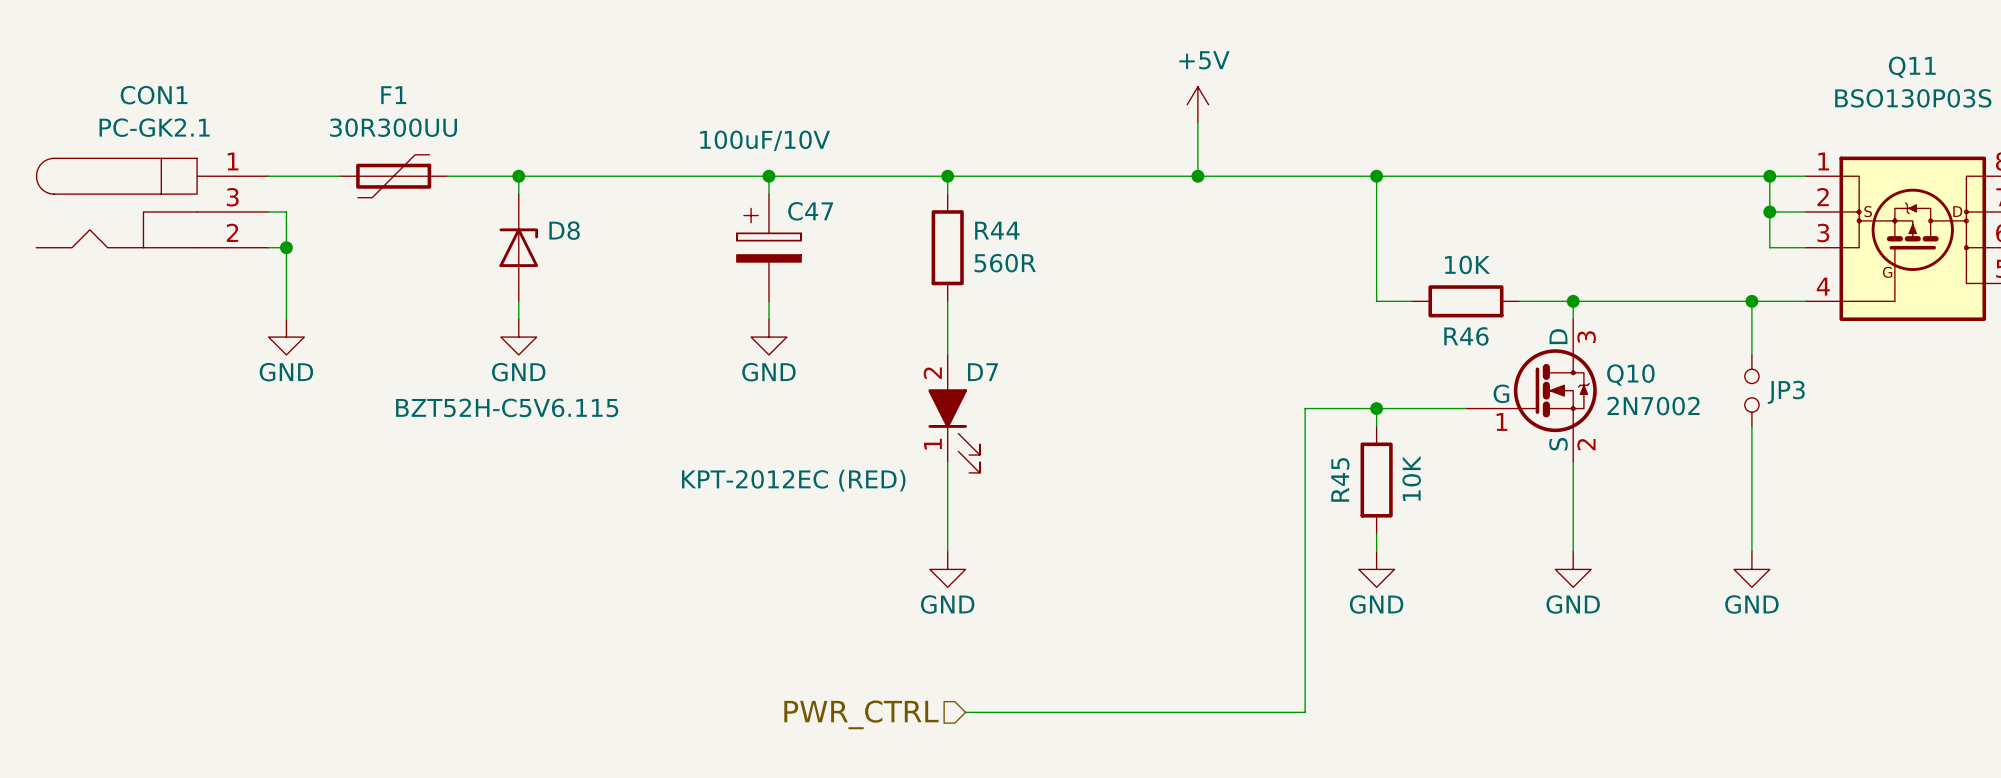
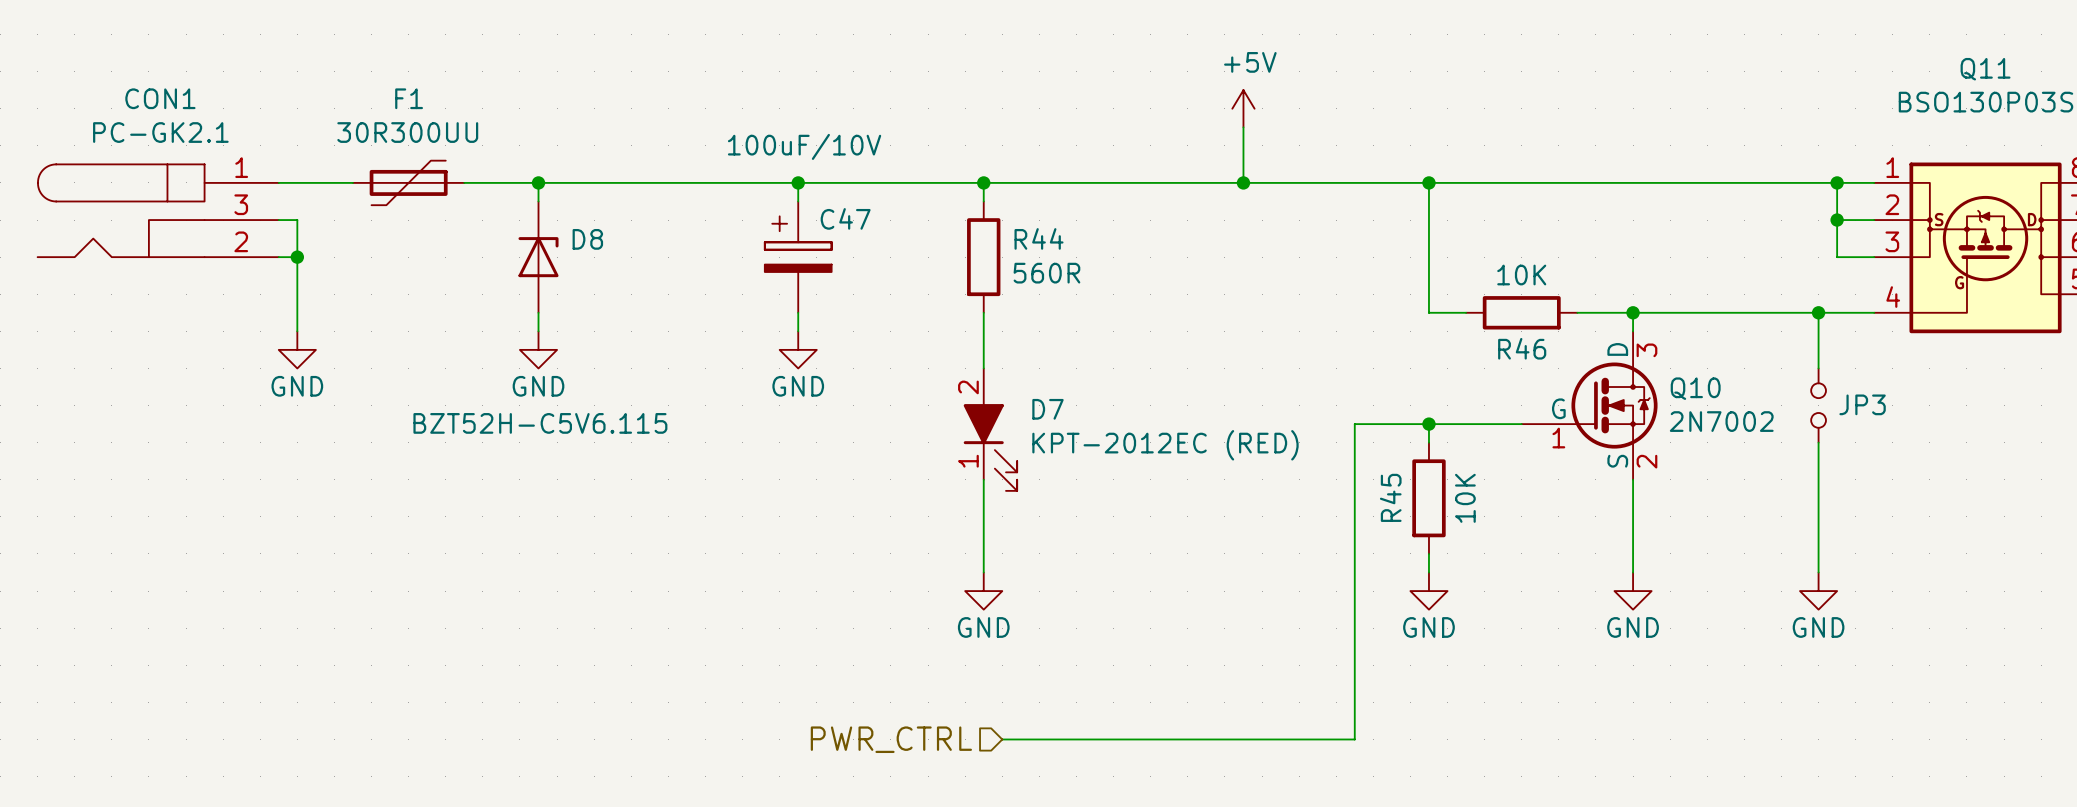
D7 name position: D7 (982, 372) -> D7 (1047, 409)
D7 value position: KPT-2012EC (RED) (793, 480) -> KPT-2012EC (RED) (1165, 445)

